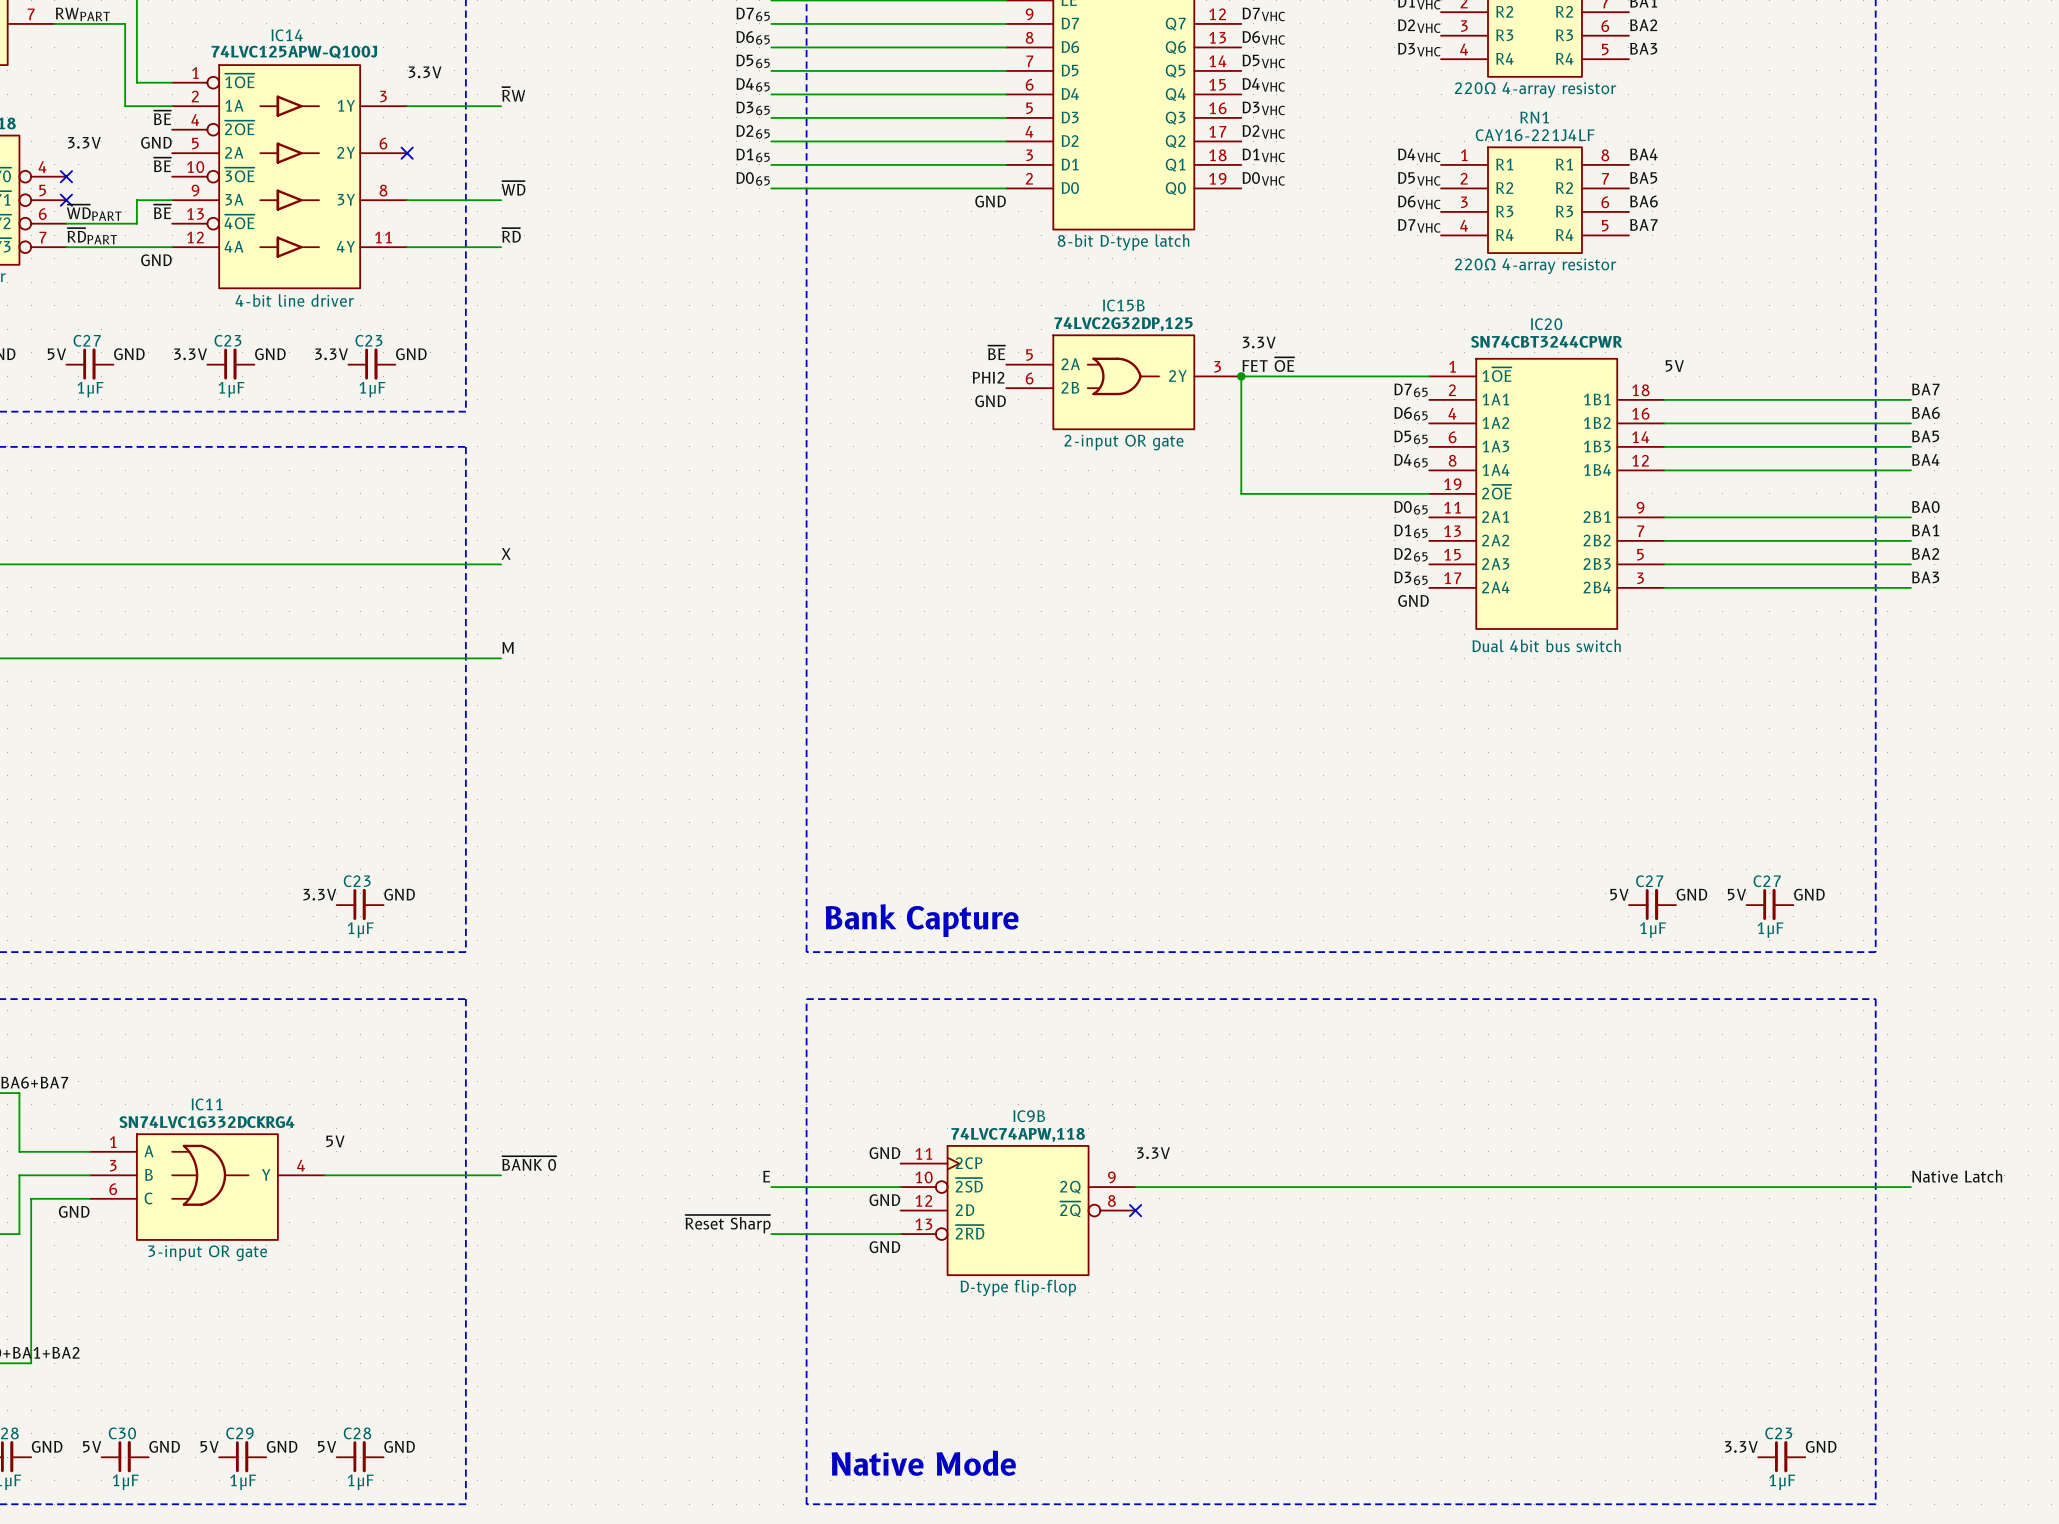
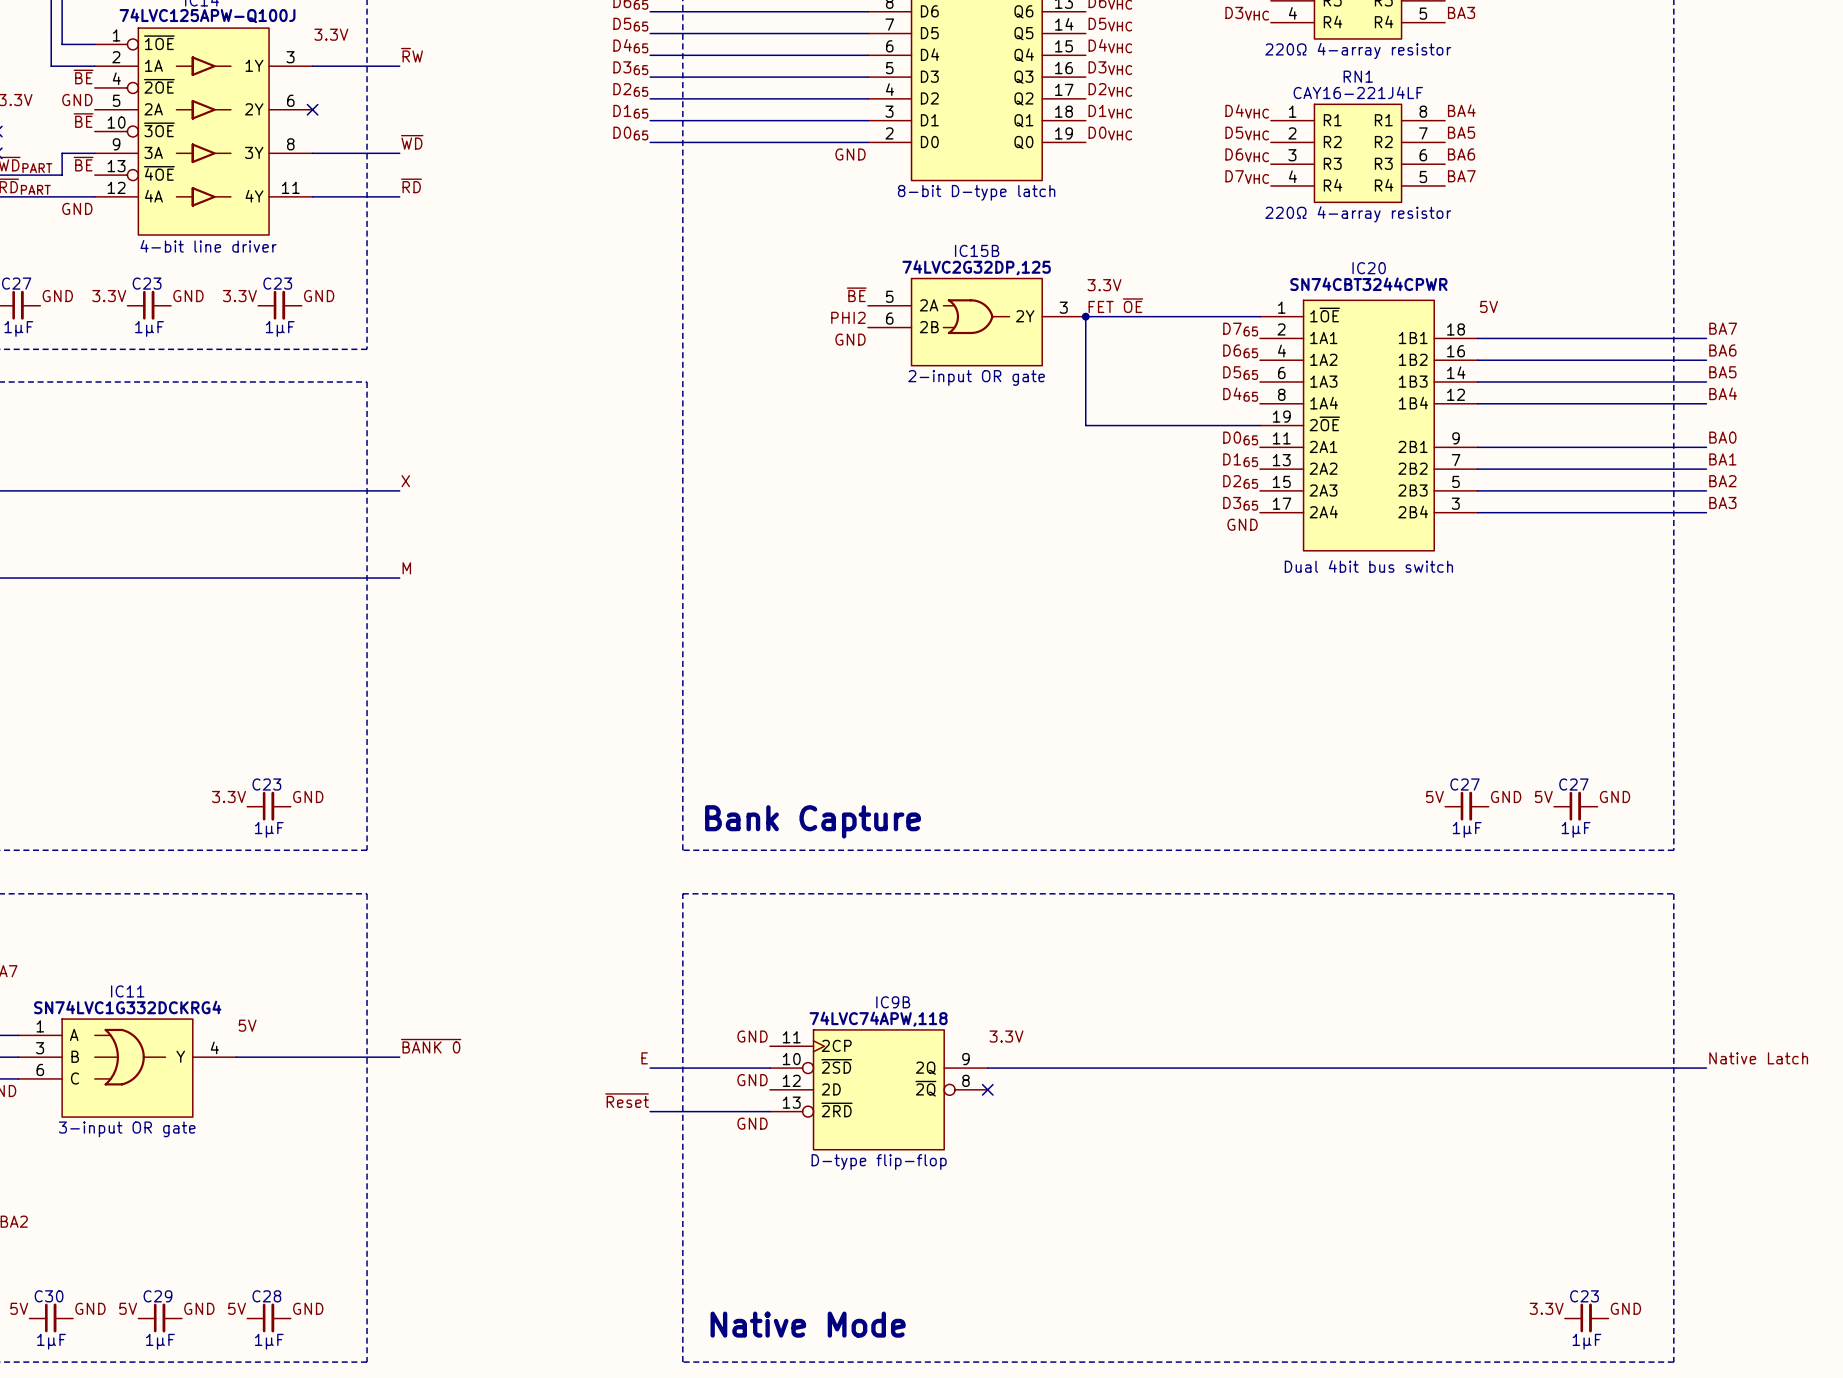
label: ~{Reset Sharp} (728, 1224) -> ~{Reset} (627, 1100)

